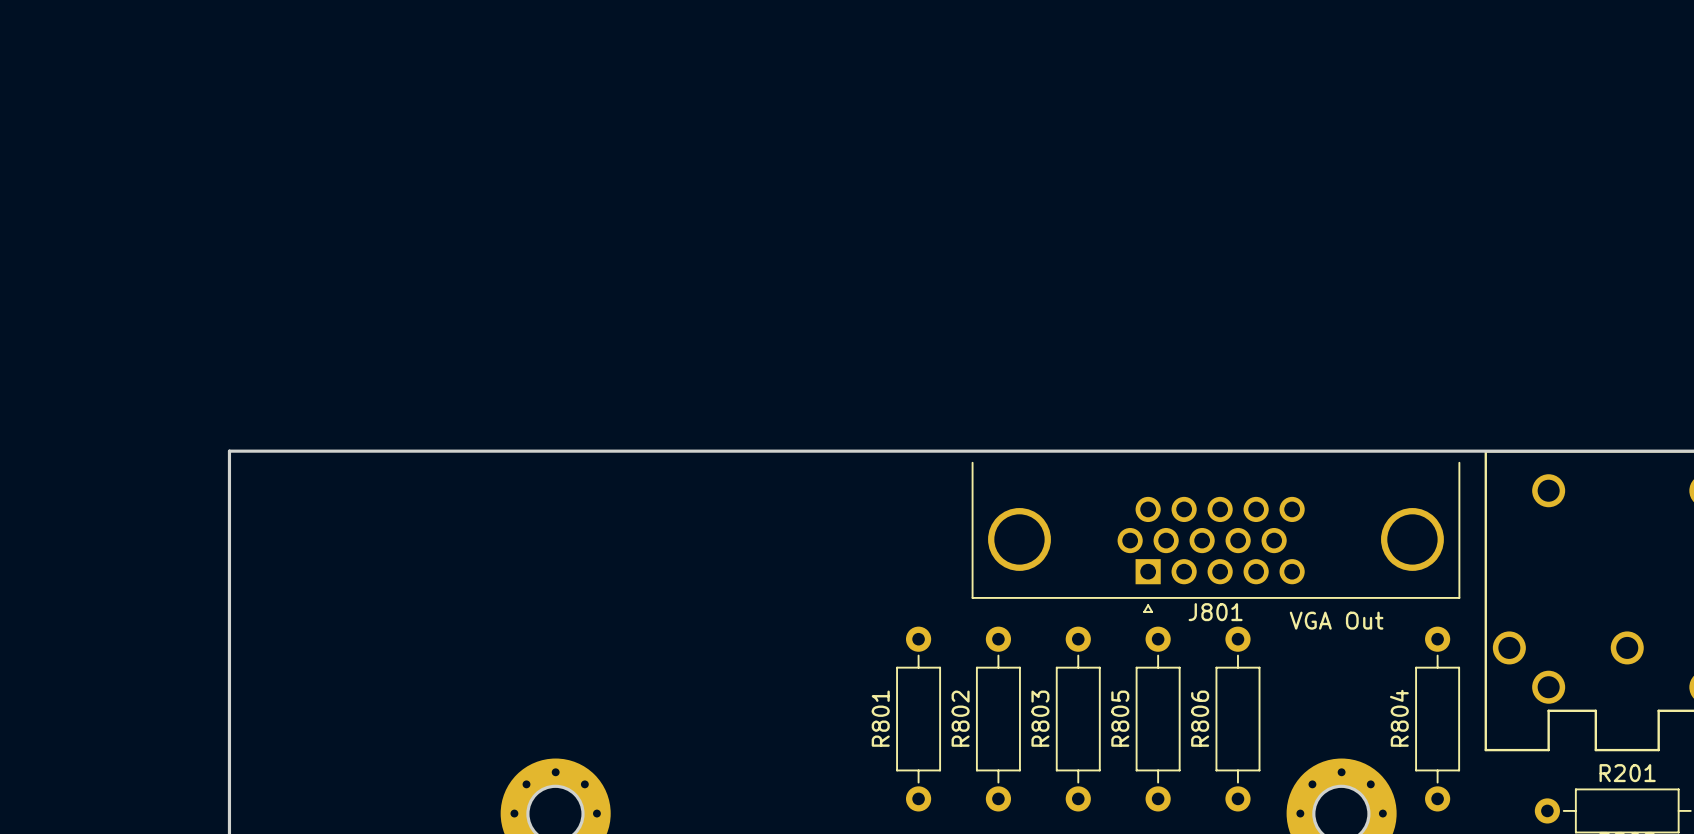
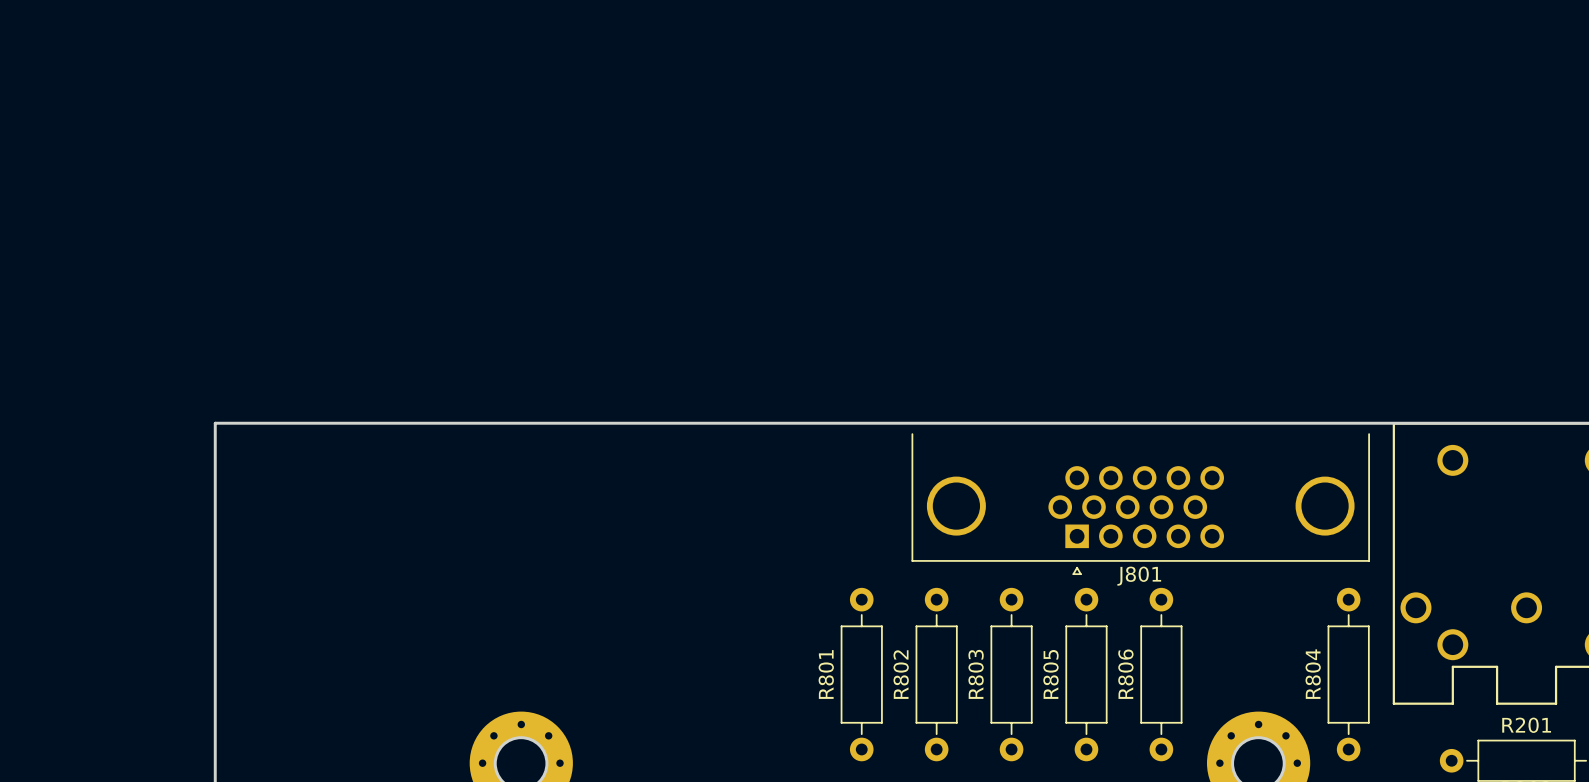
text: VGA Out (1336, 620) -> none

